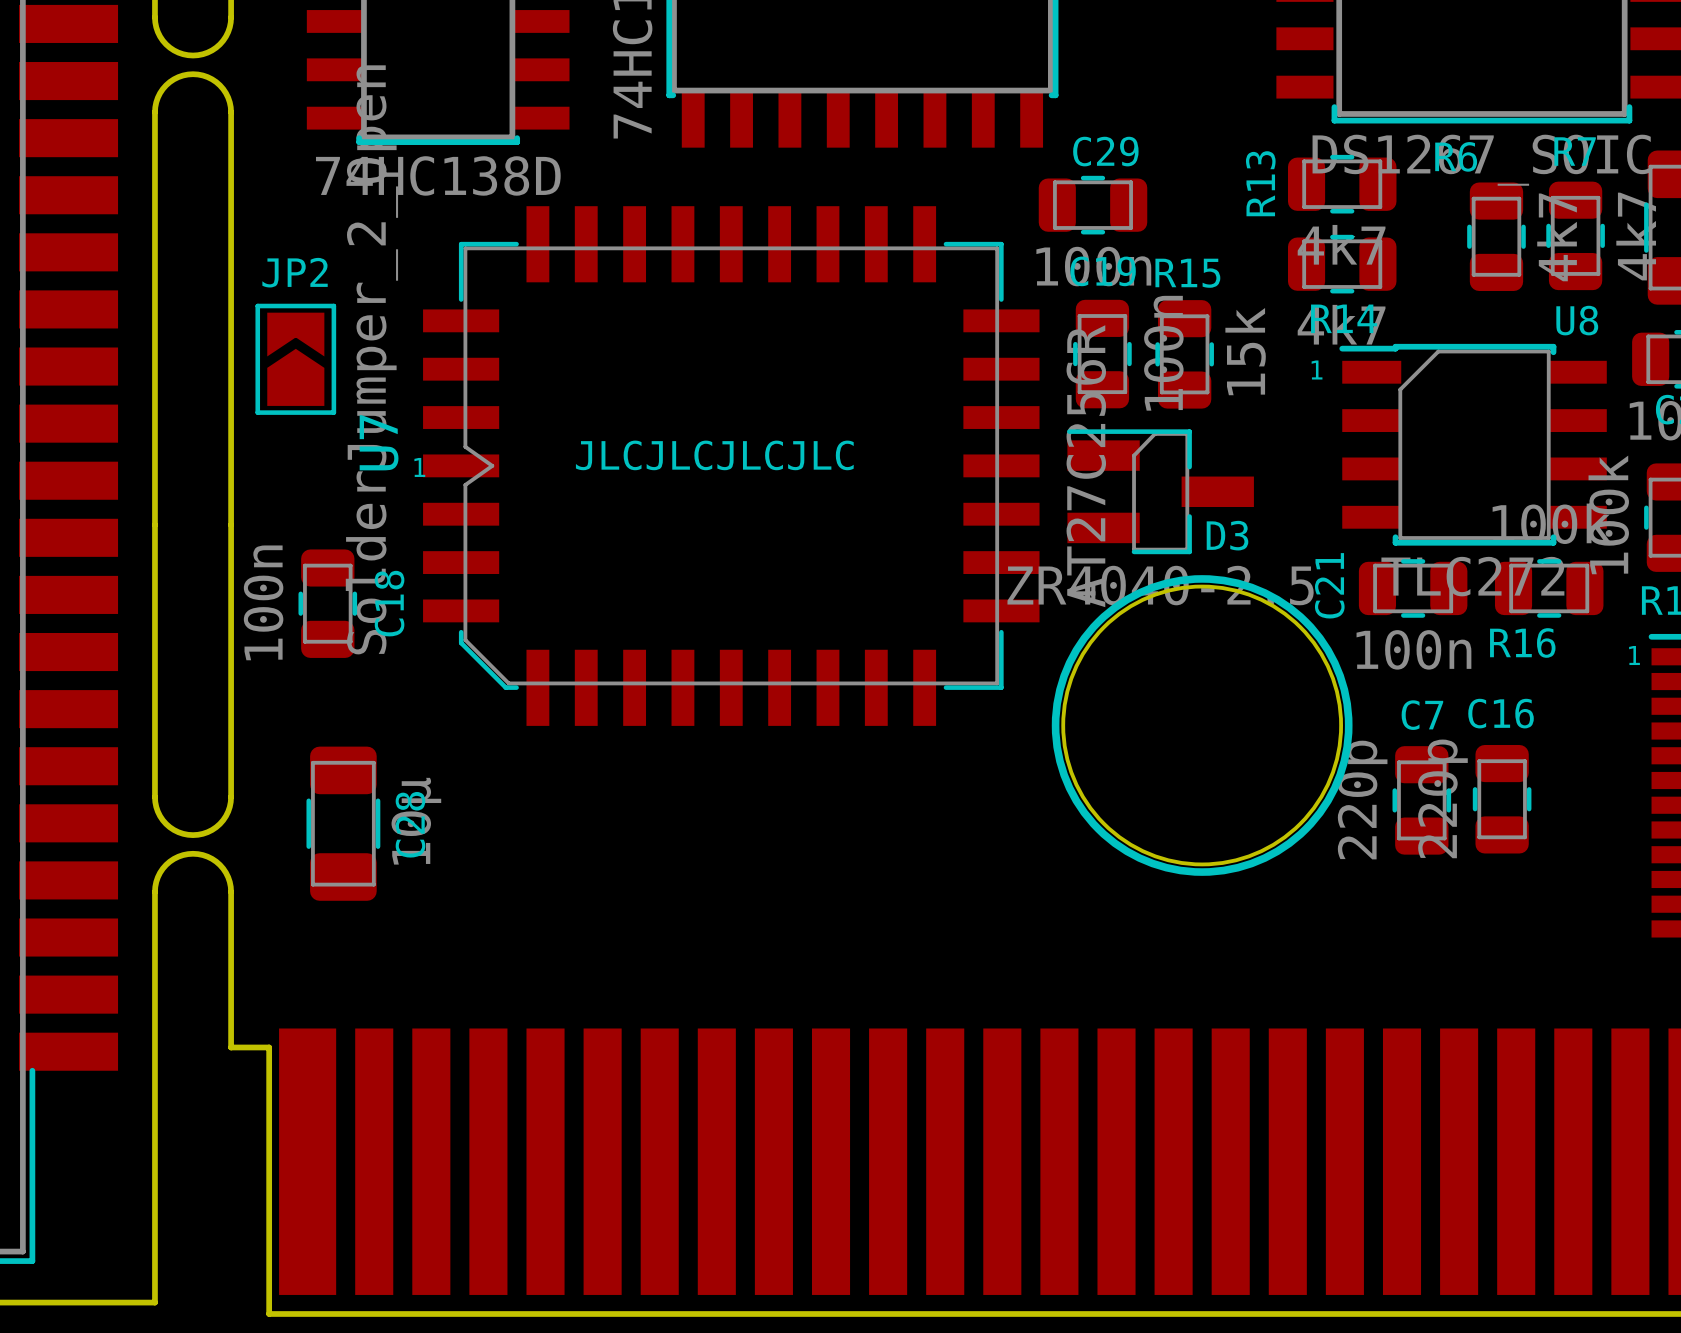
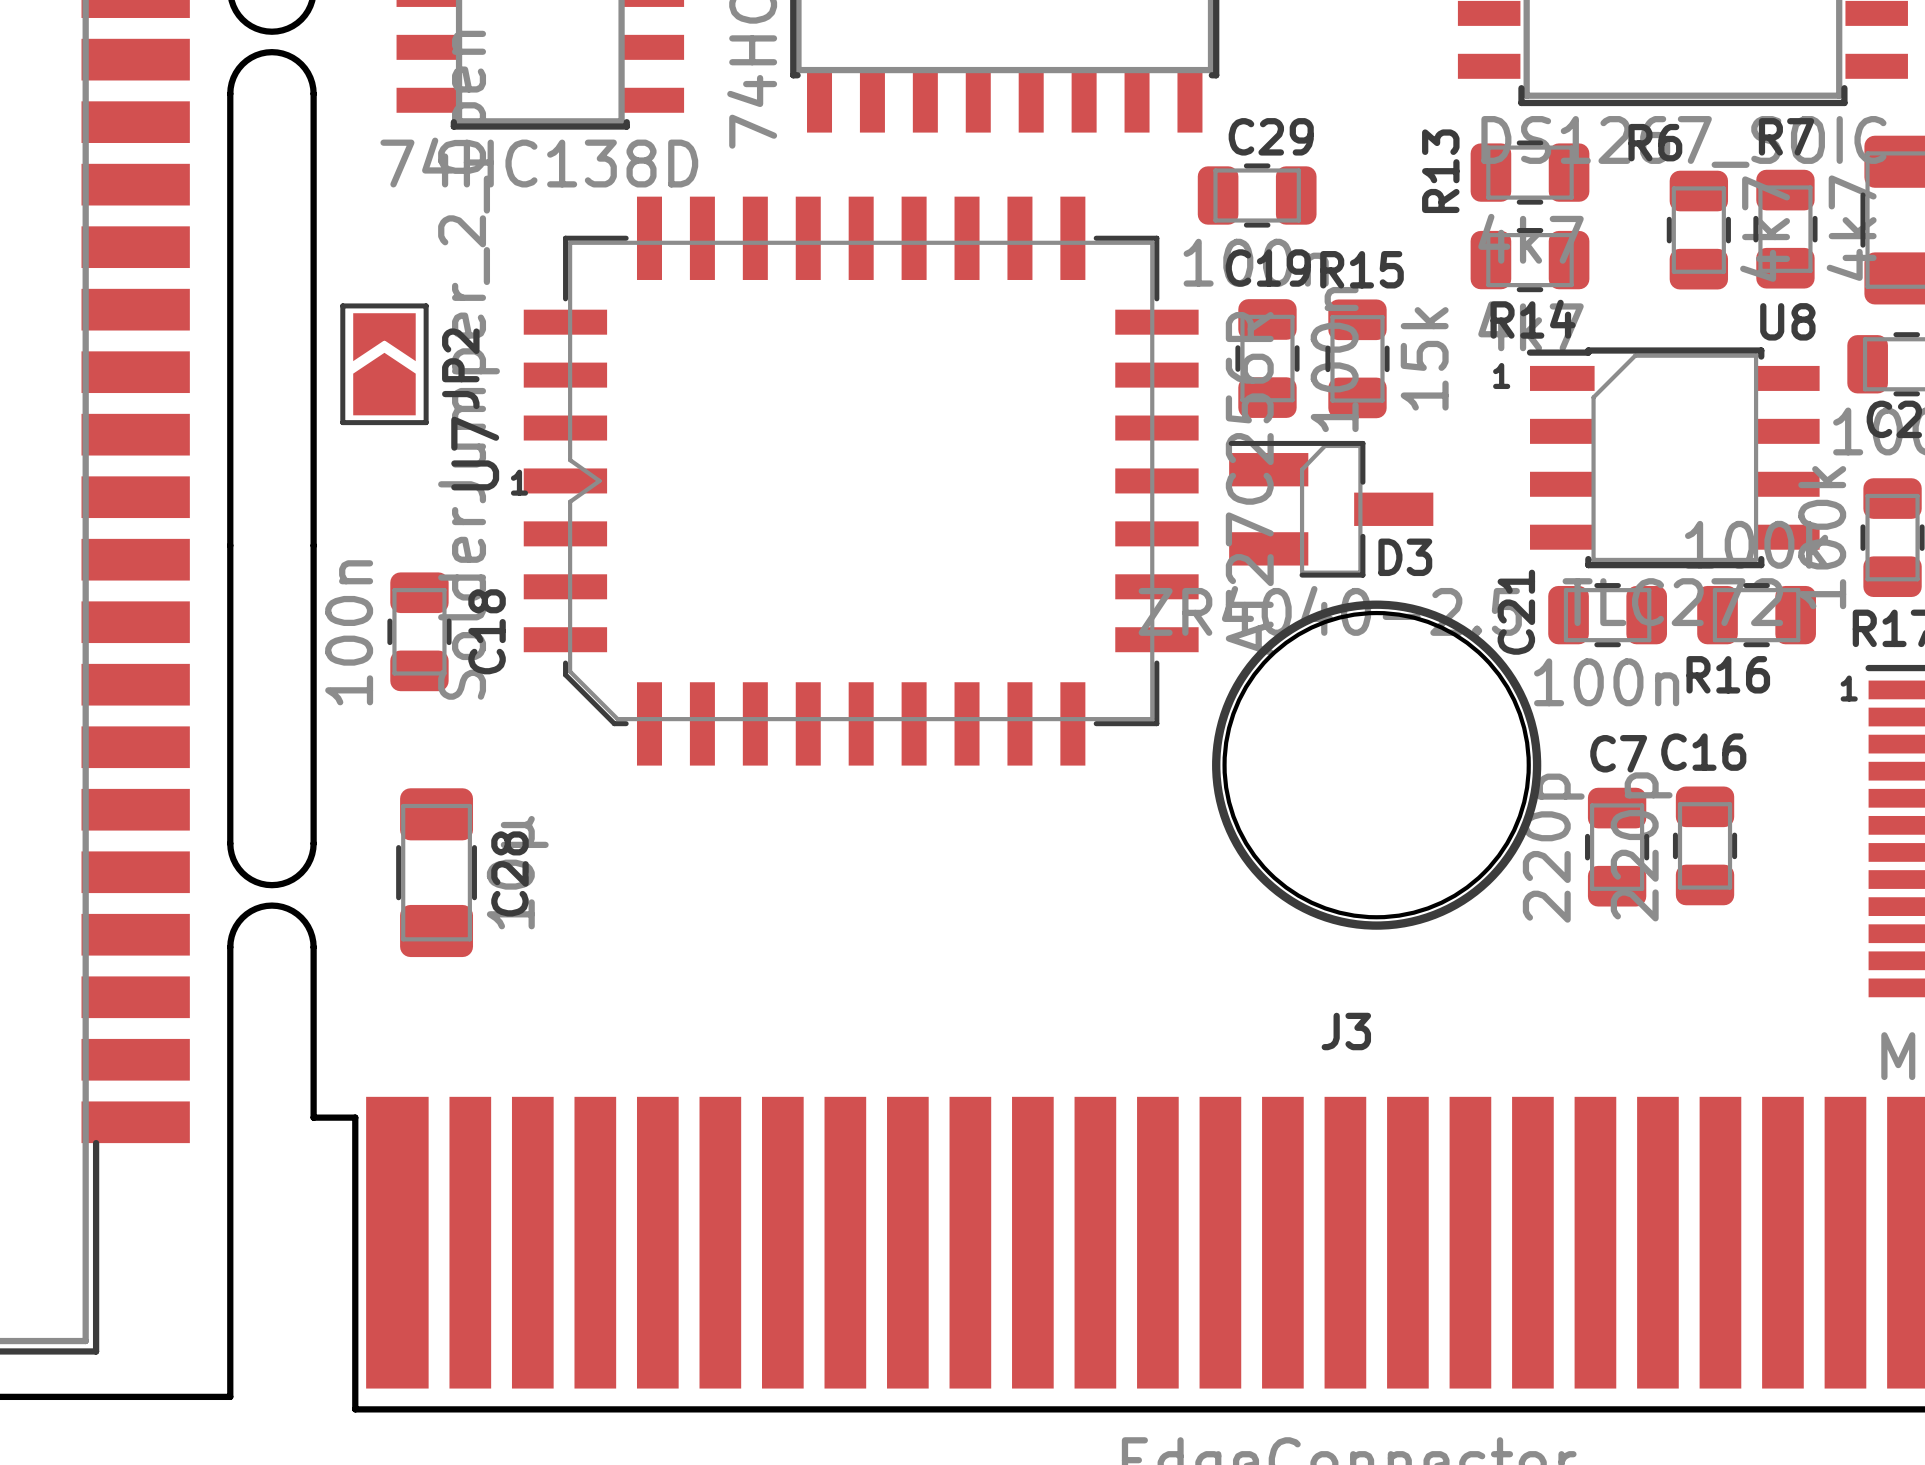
JP2 name rotation: 0° (295, 272) -> 90° counterclockwise (460, 368)
JP2 name position: JP2 (295, 272) -> JP2 (460, 368)
text: JLCJLCJLCJLC (714, 455) -> none
J3 name: none -> J3 (1346, 1031)

